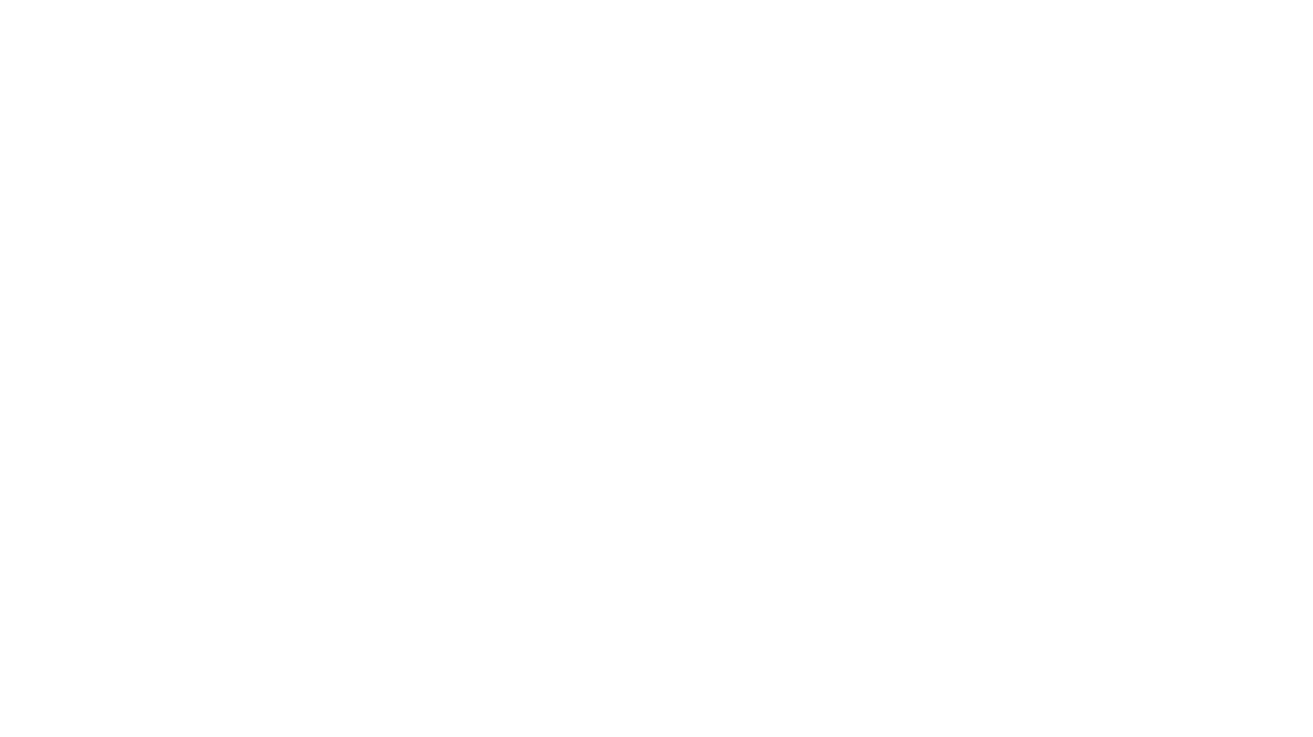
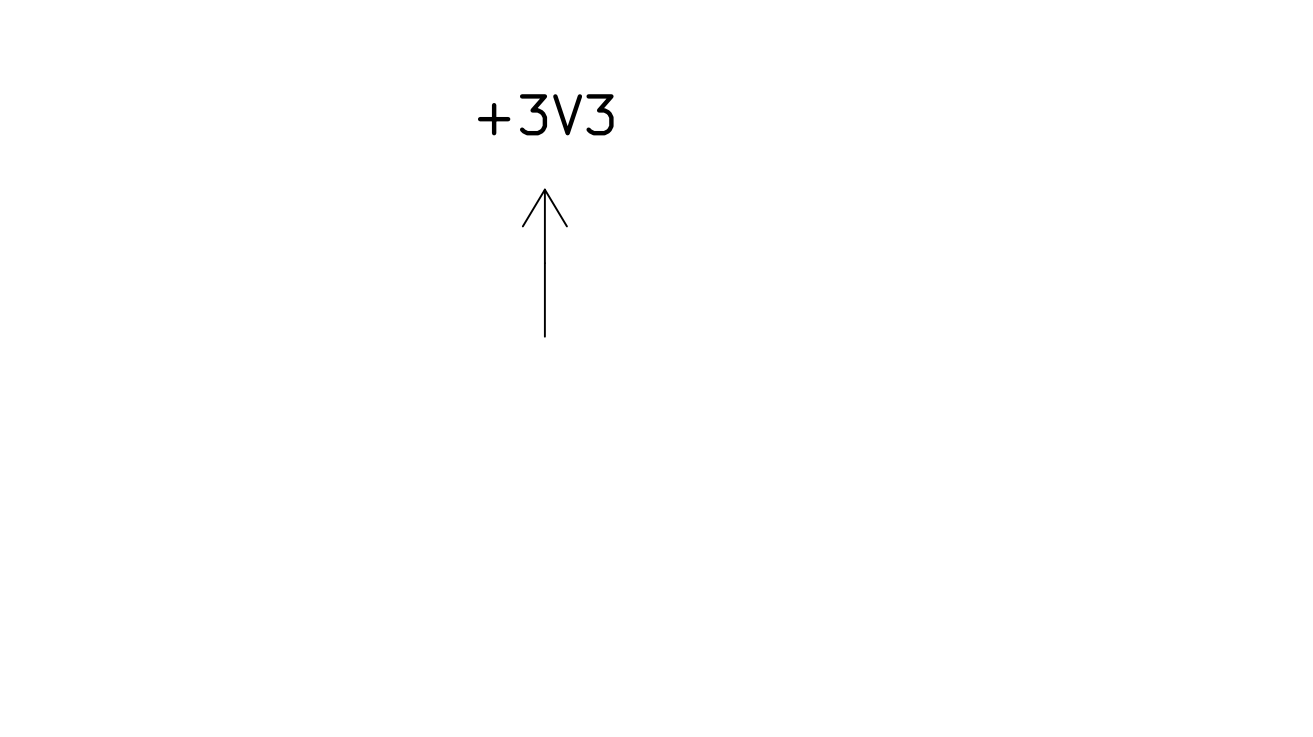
power symbol: none -> +3V3 (544, 226)
wire: none -> (544, 263) (544, 336)

